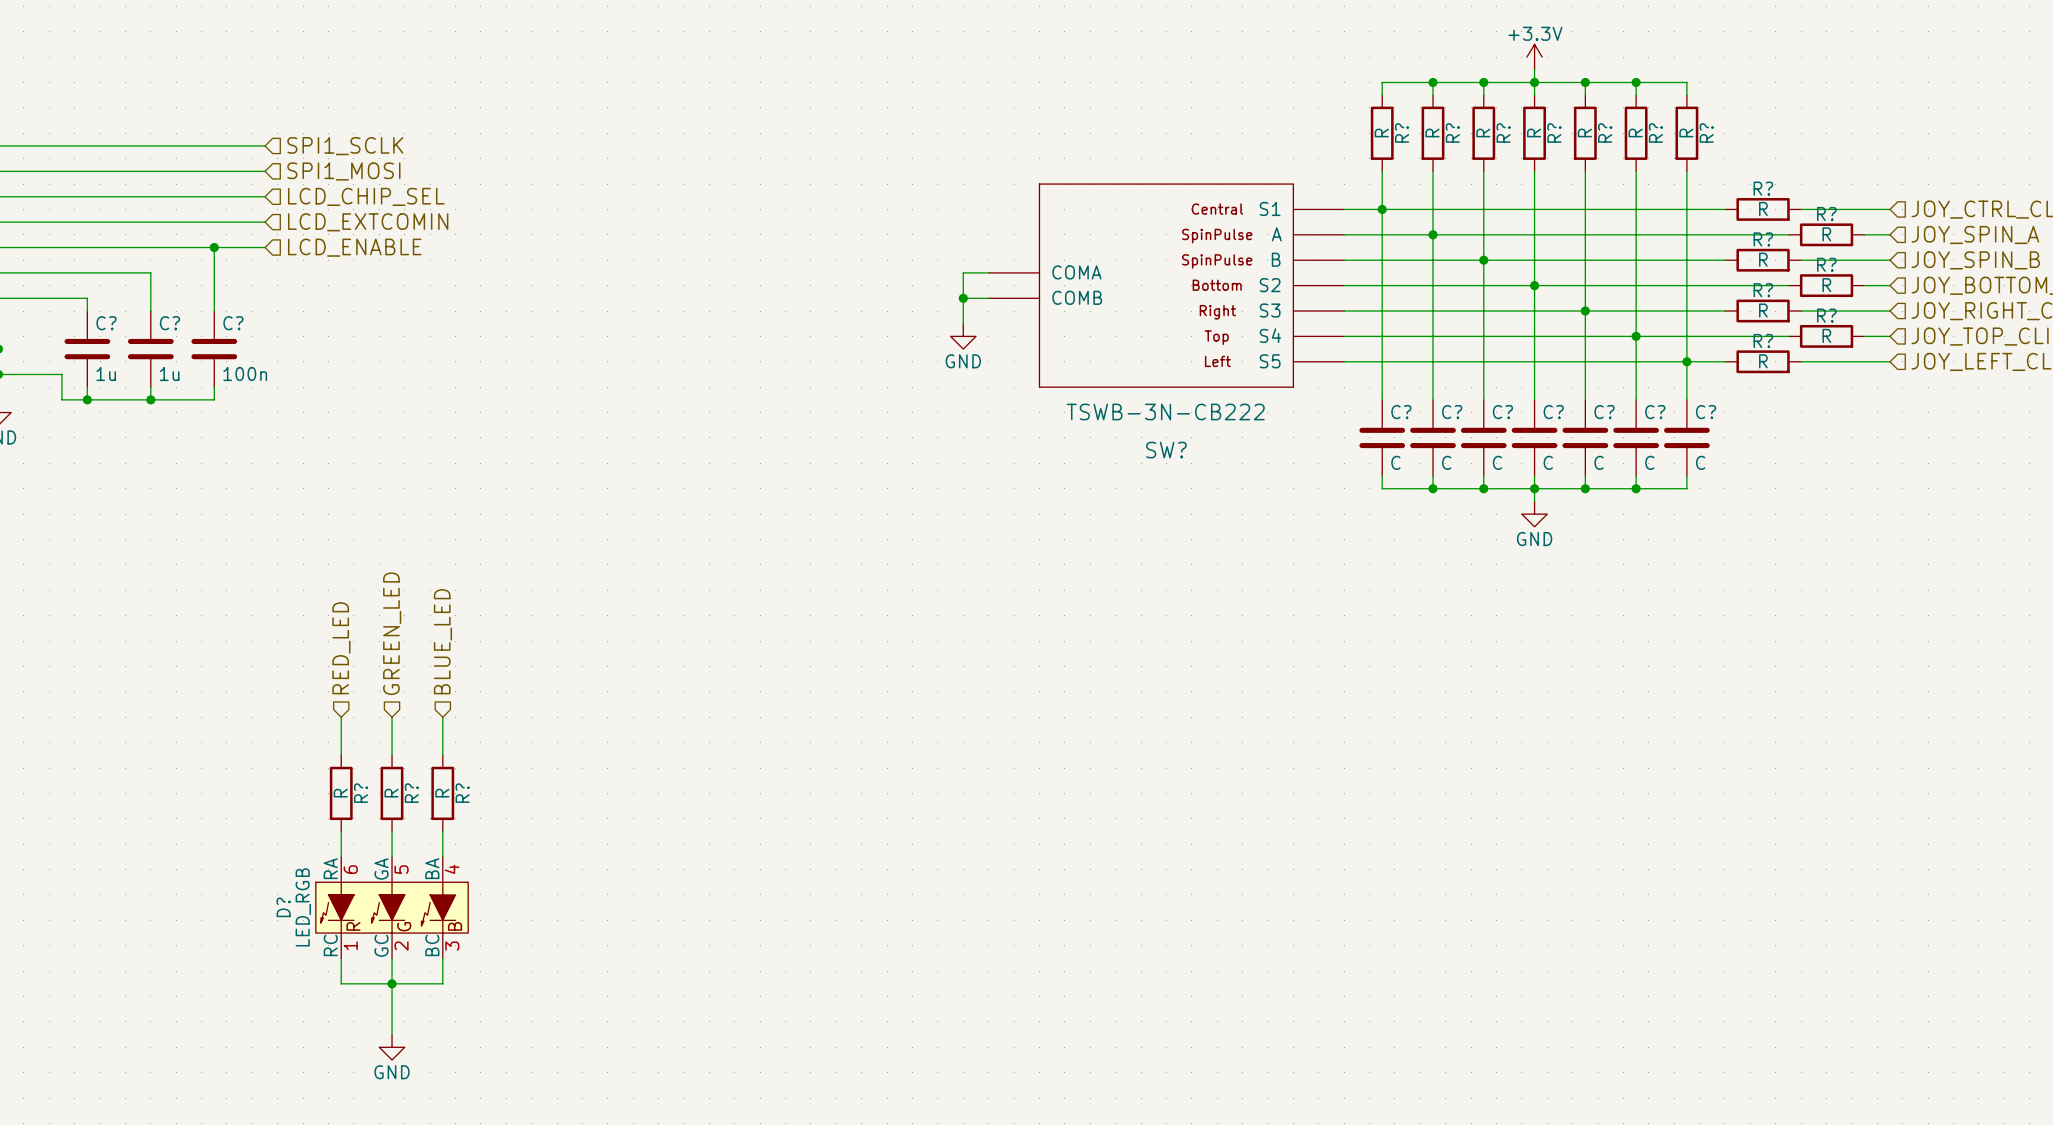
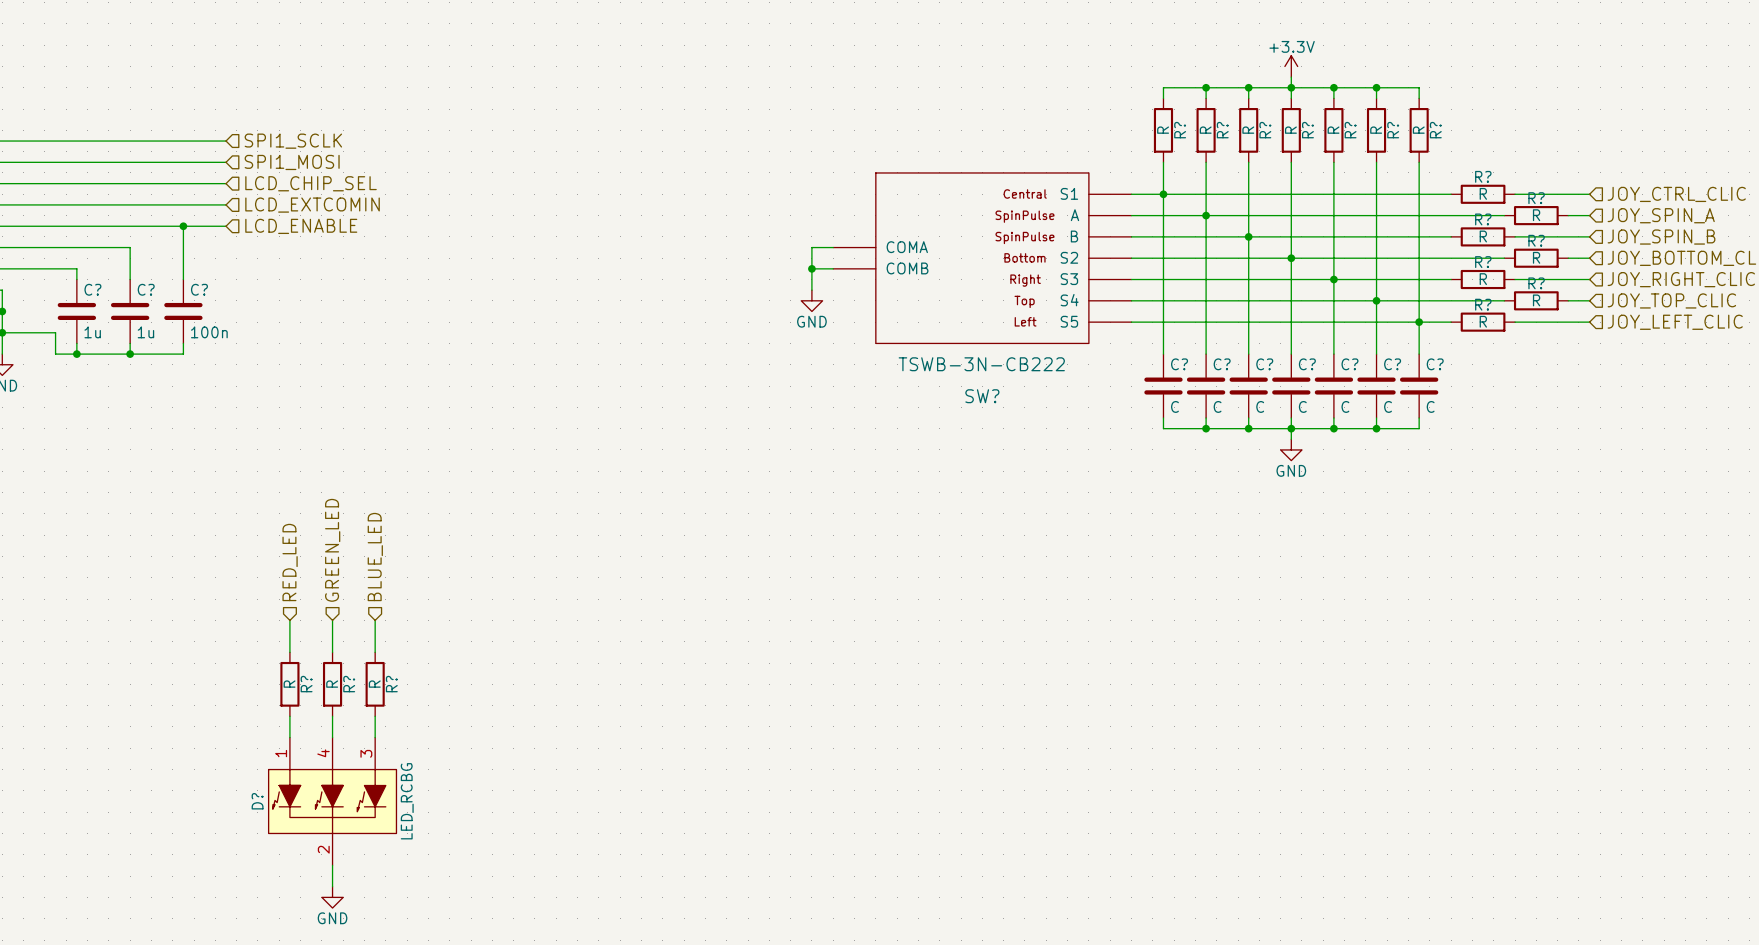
D?: LED_RGB (392, 907) -> none
D?: none -> LED_RCBG (332, 801)
wire: (341, 958) (341, 983) (442, 983) (442, 958) -> none
junction: (392, 983) -> none

